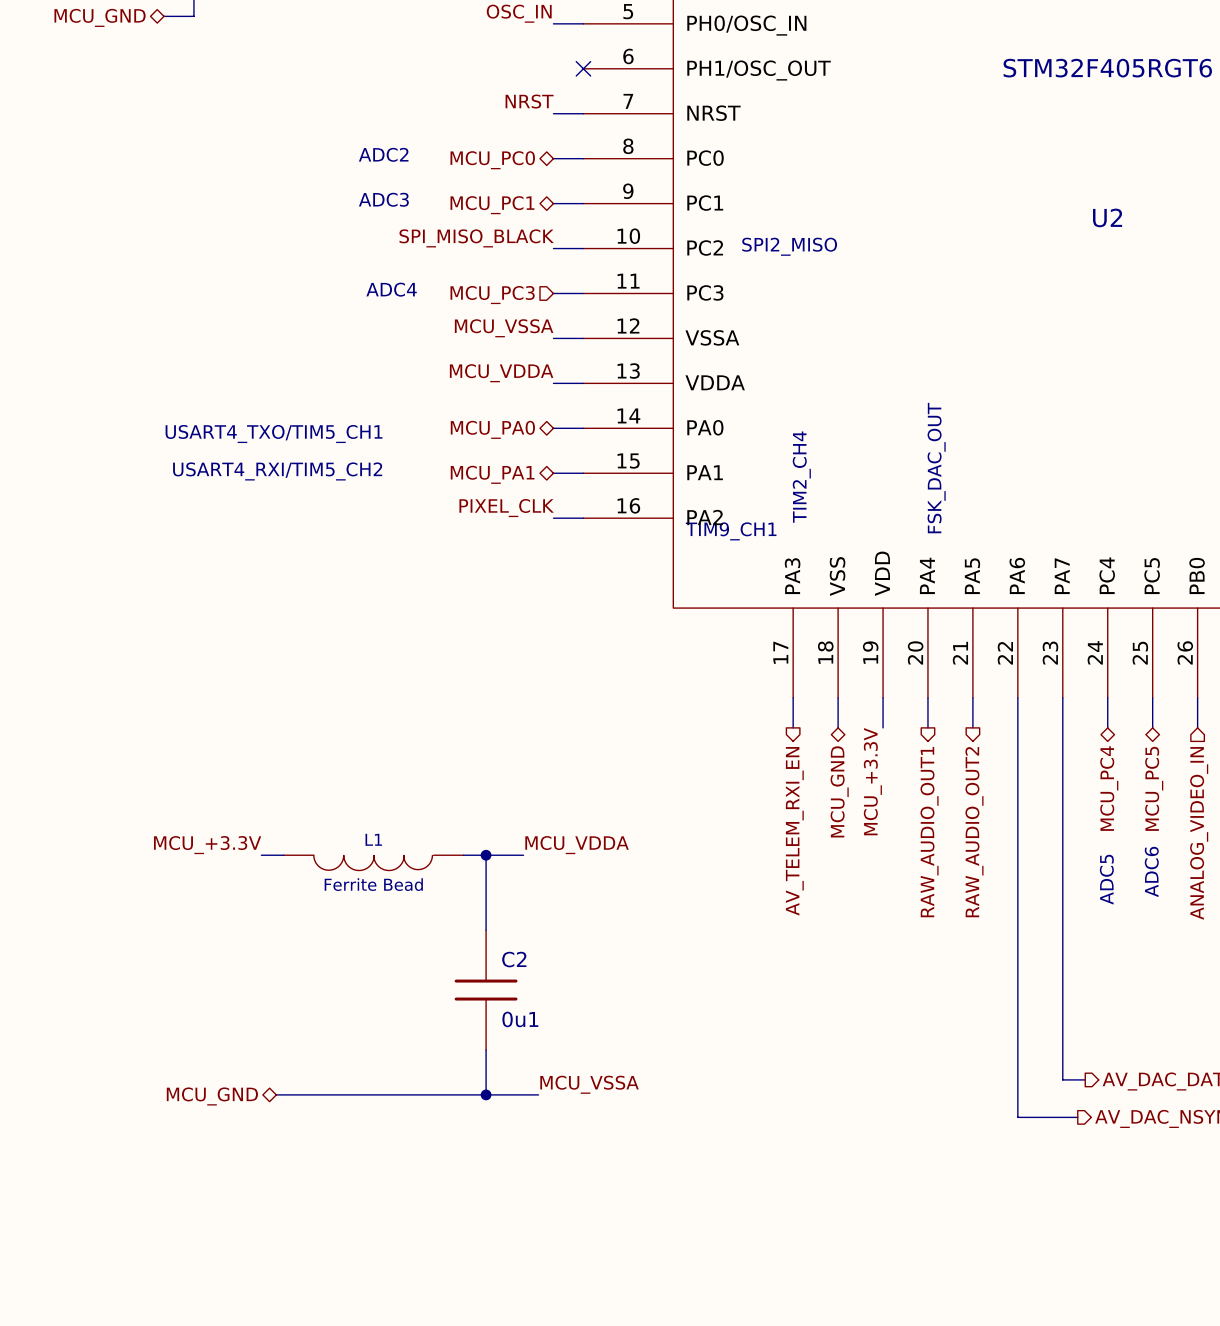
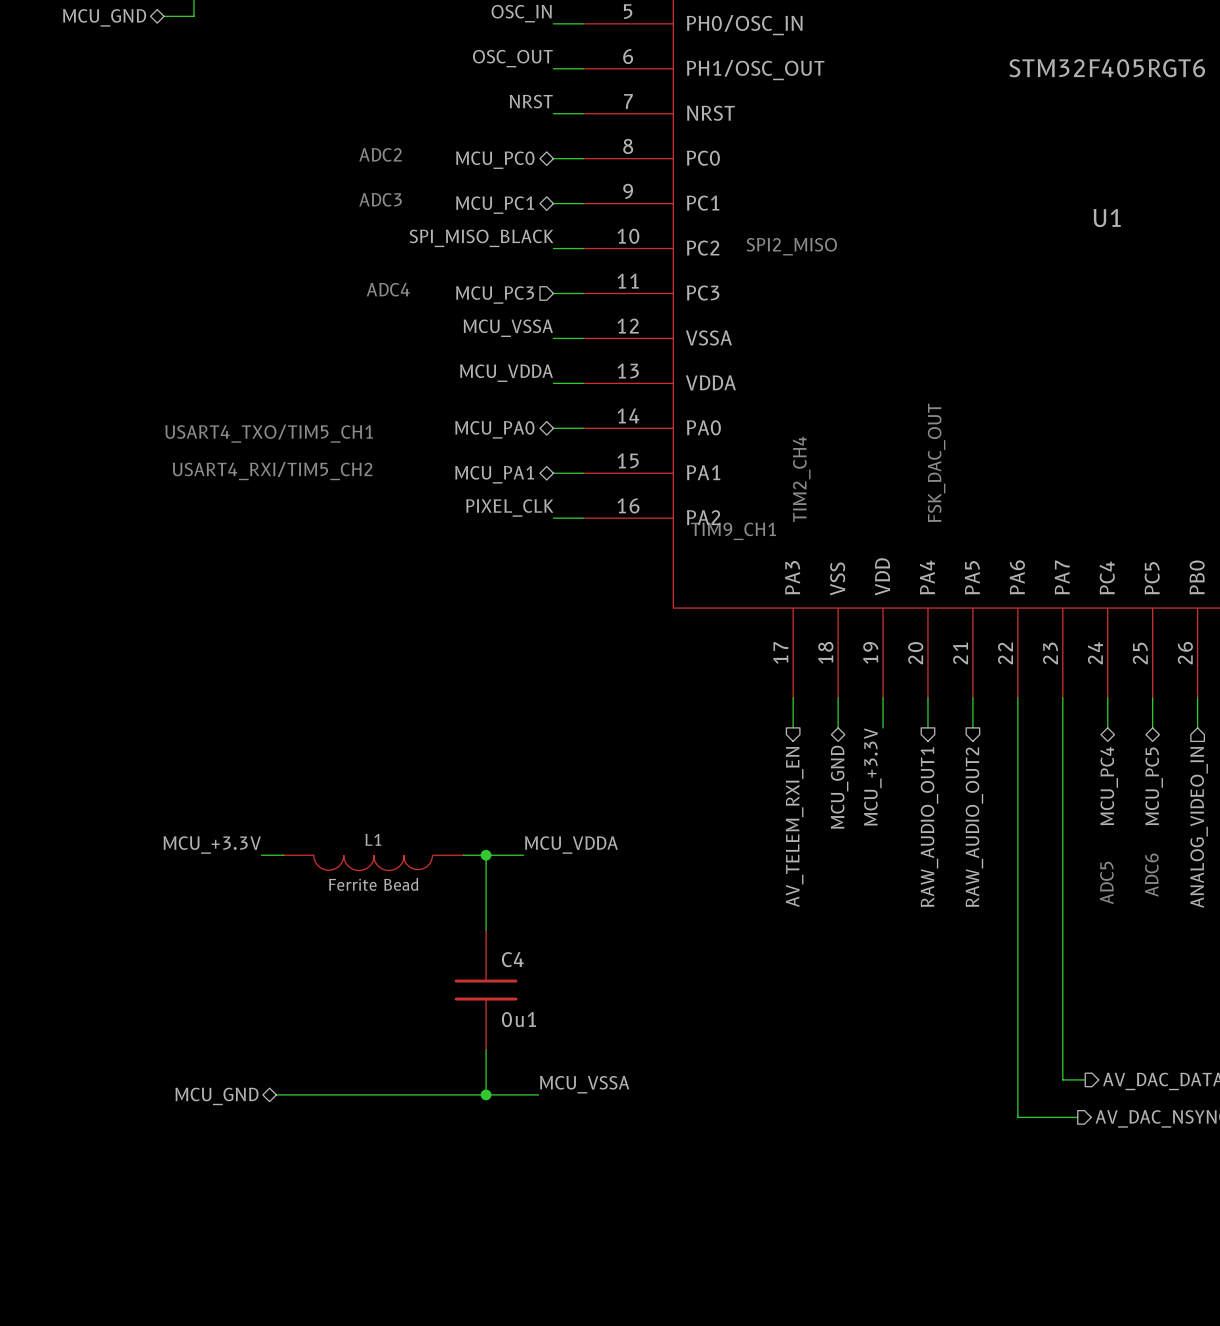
label: none -> OSC_OUT (512, 58)
wire: none -> (553, 68) (583, 68)
no-connect mark: (583, 68) -> none
U2 name: U2 (1107, 217) -> U1 (1107, 218)
C2 name: C2 (514, 959) -> C4 (512, 959)

